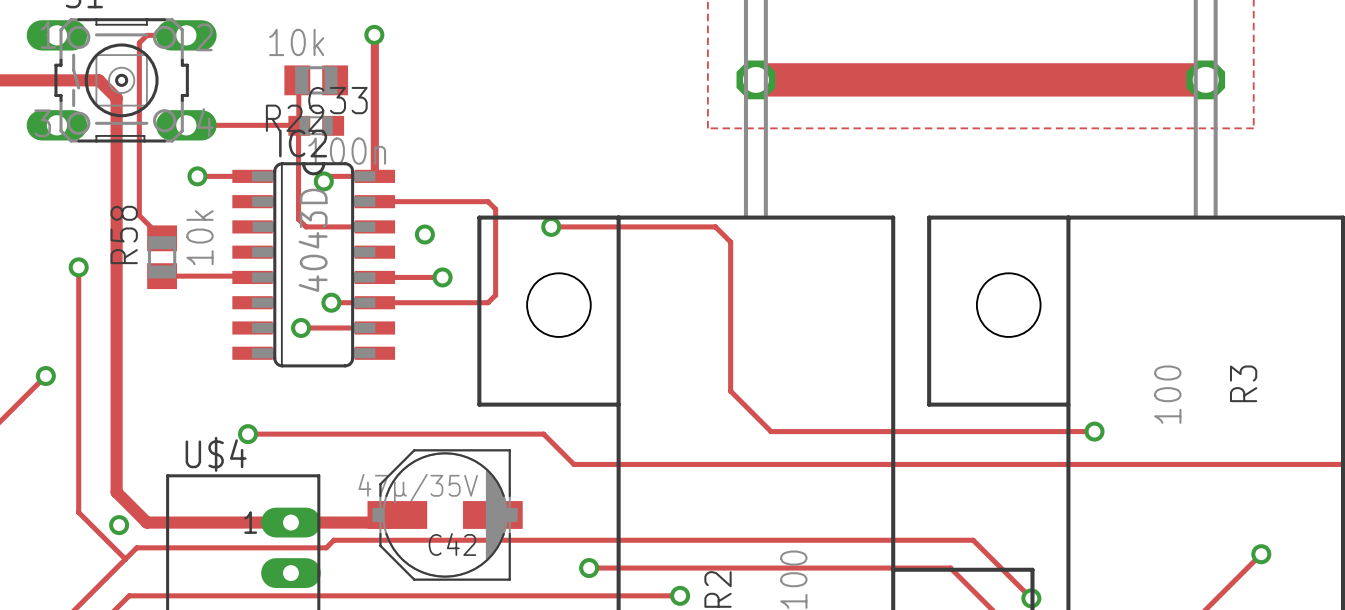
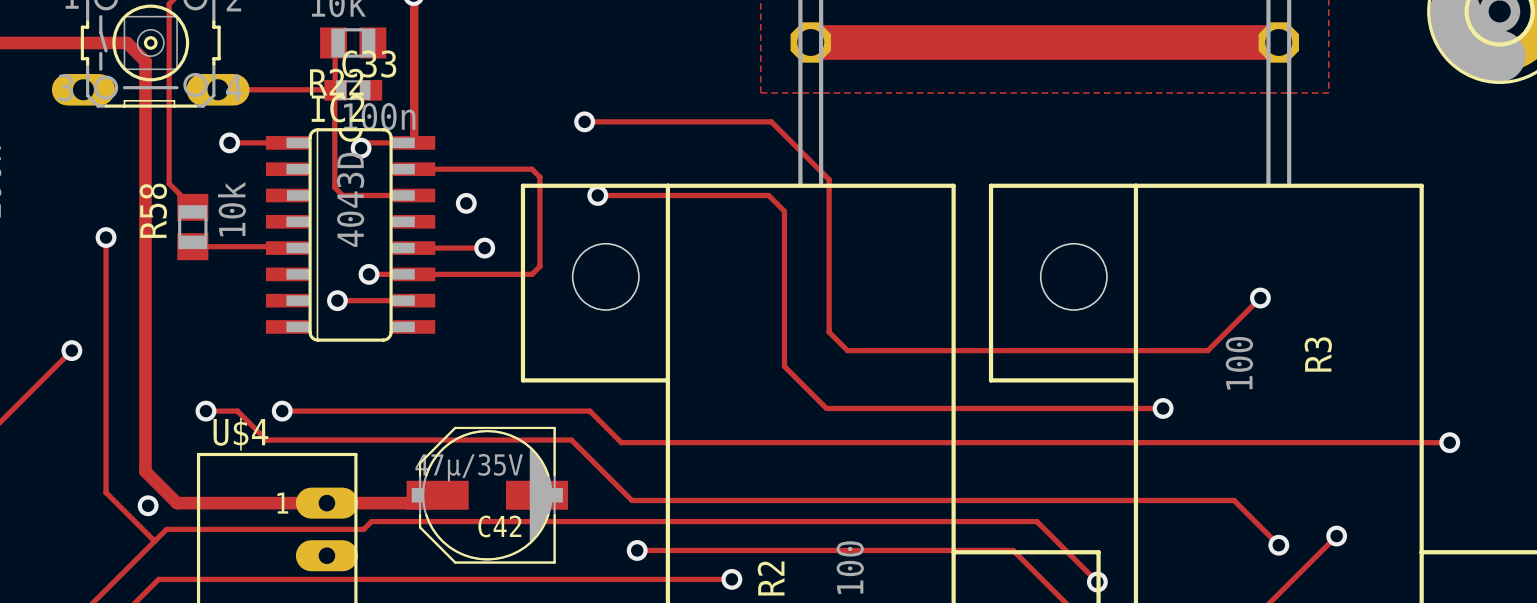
track: none -> (584, 121) (771, 121) (829, 179) (829, 332) (847, 350) (1207, 350) (1260, 298)
via: none -> (584, 121)
via: none -> (1260, 298)
track: none -> (205, 411) (237, 411) (266, 440) (571, 440) (631, 500) (1234, 500) (1278, 545)
via: none -> (205, 411)
via: none -> (1278, 545)

